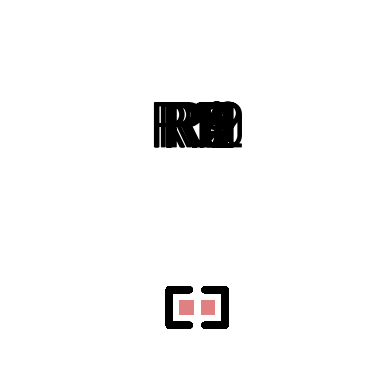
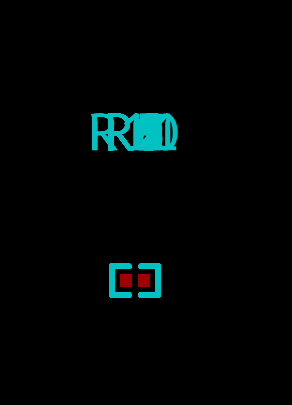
part: (197, 307) -> none

